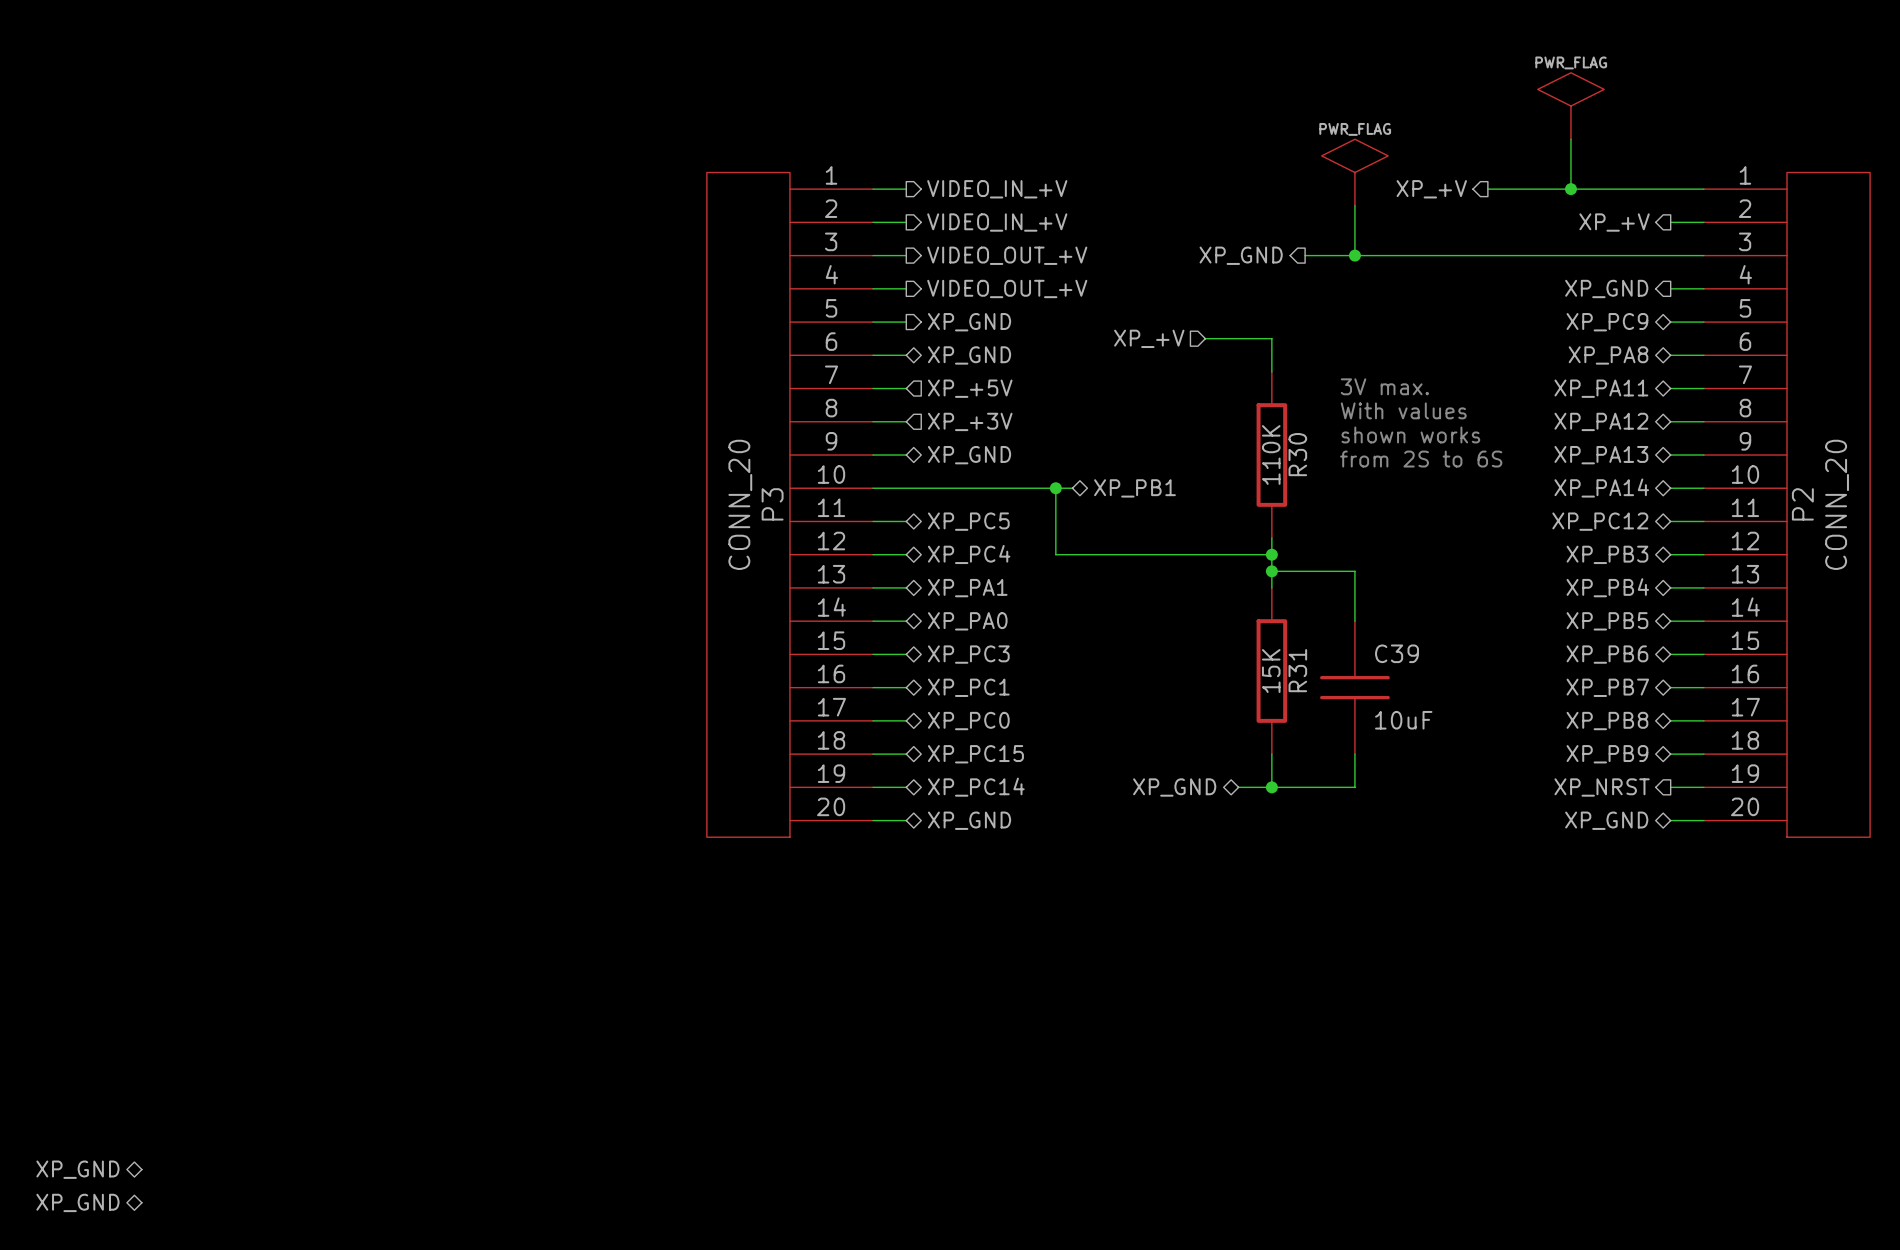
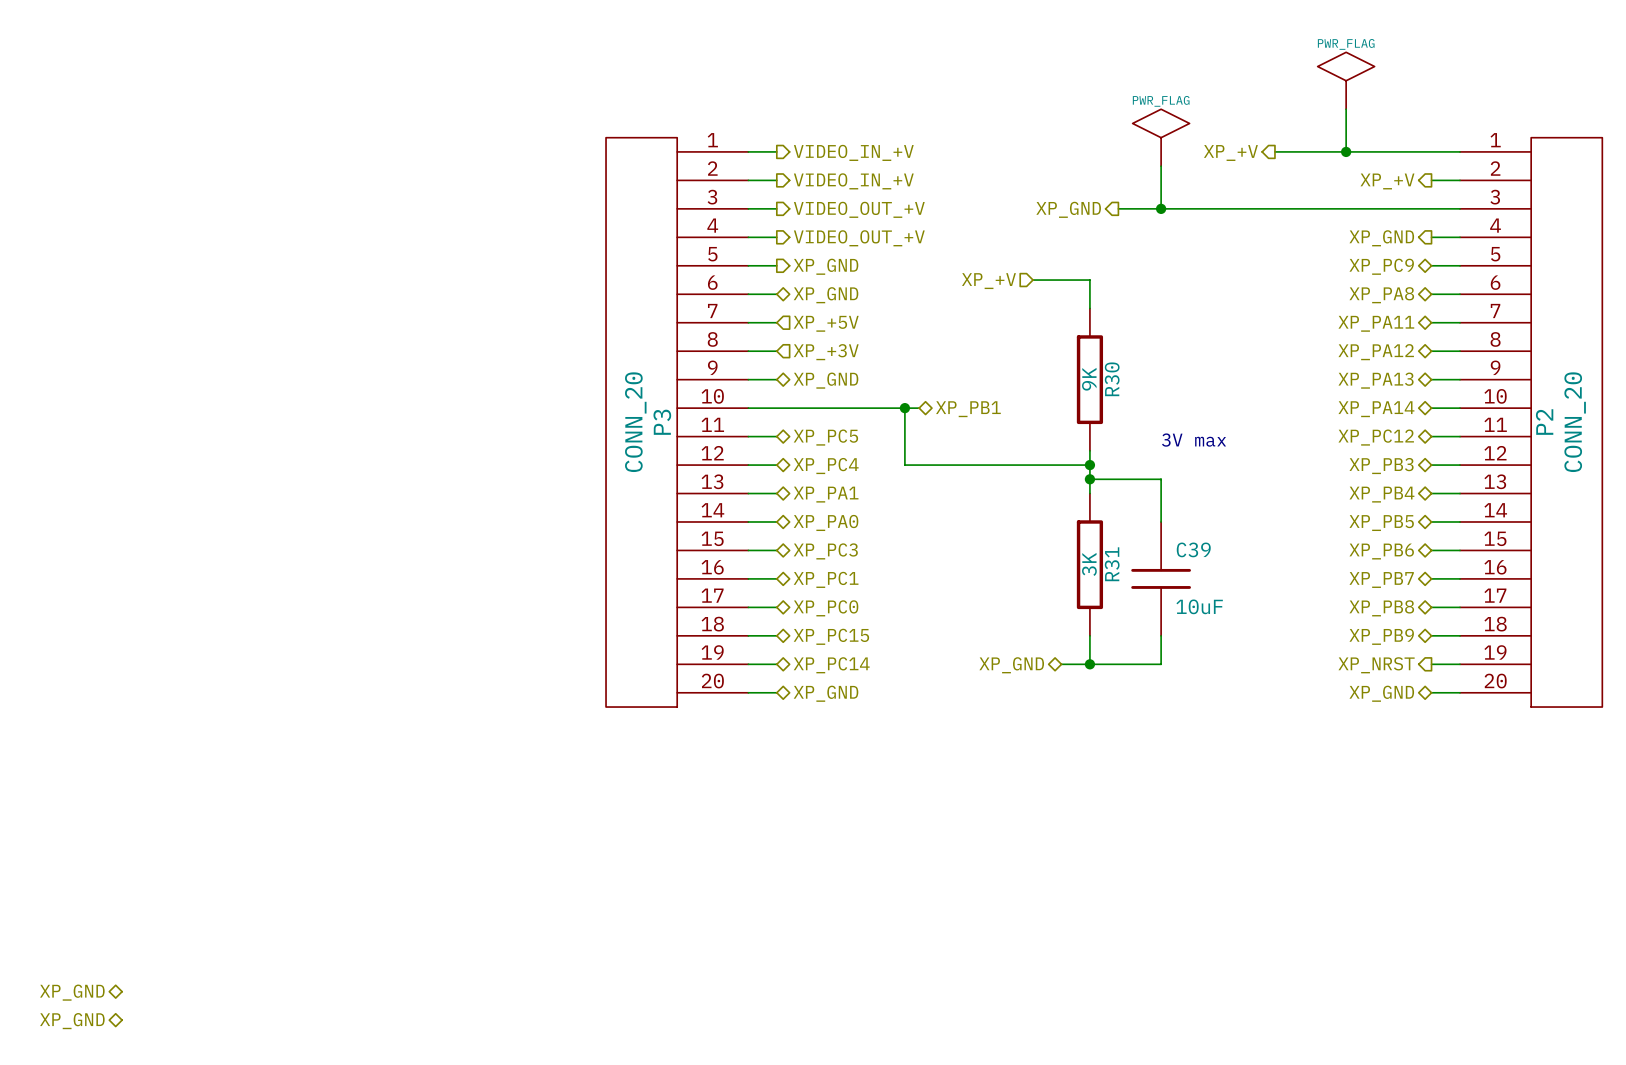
text: 3V max. (1384, 386) -> none
text: With values (1403, 410) -> none
text: shown works (1410, 434) -> none
R30 value: 110K (1271, 455) -> 9K (1089, 379)
text: from 2S to 6S (1421, 459) -> none
text: none -> 3V max (1194, 440)
R31 value: 15K (1271, 671) -> 3K (1089, 564)

